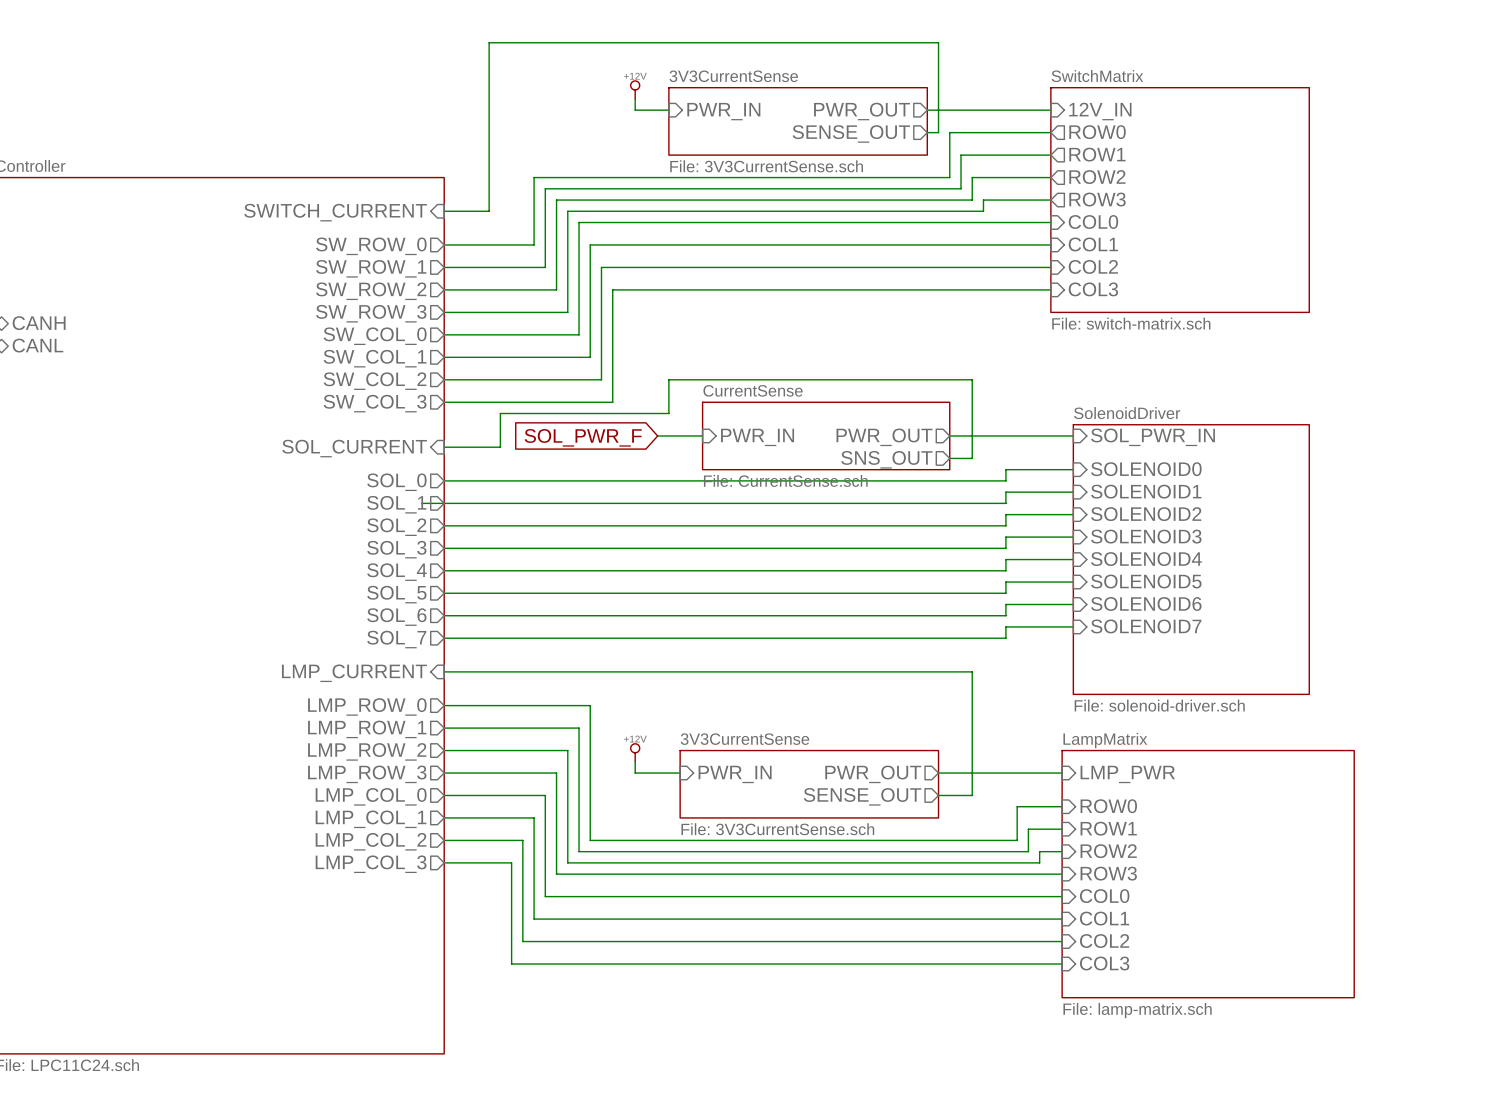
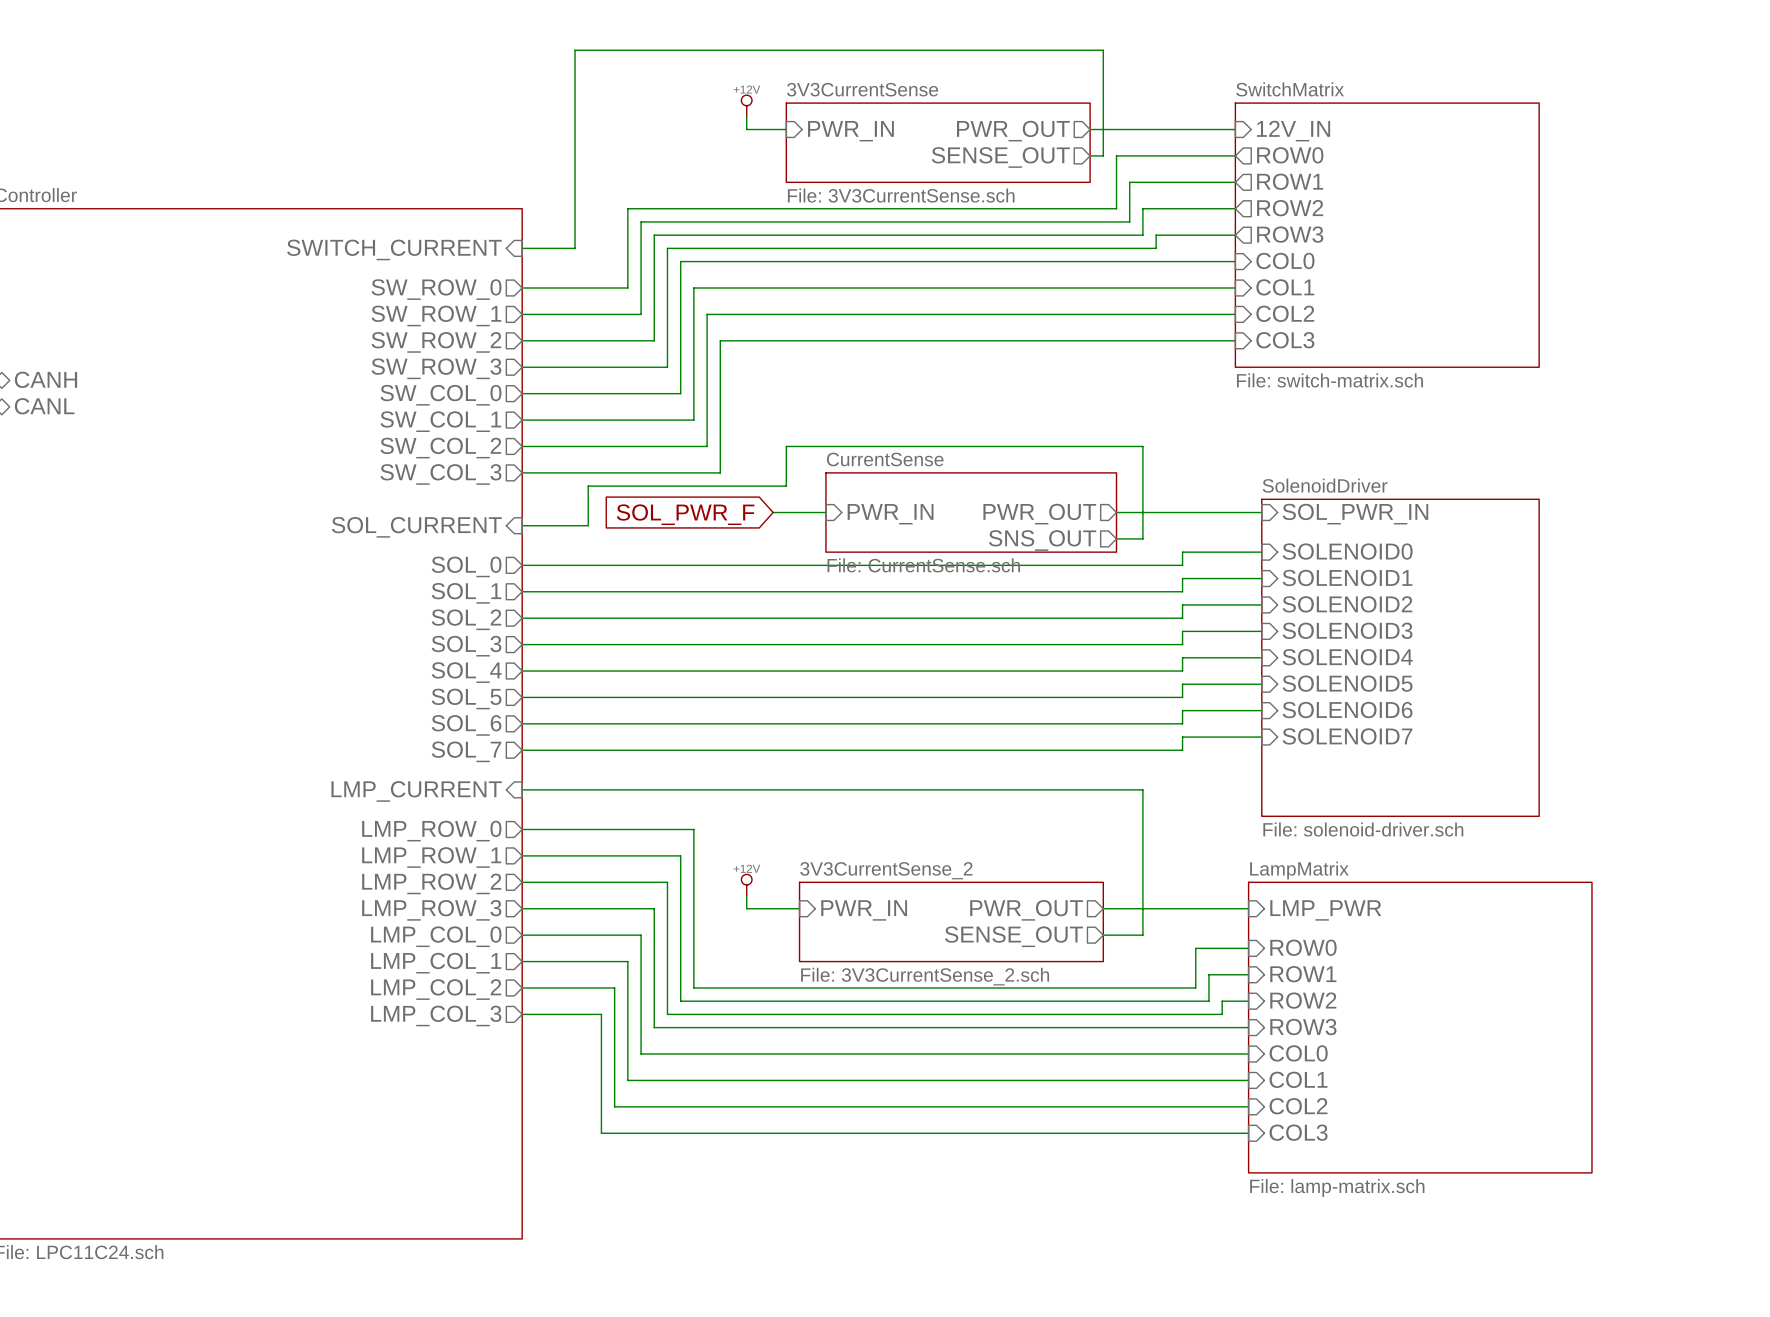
wire: (421, 503) (444, 503) -> none
sheet 3V3CurrentSense name: 3V3CurrentSense (744, 739) -> 3V3CurrentSense_2 (886, 870)
sheet 3V3CurrentSense value: File: 3V3CurrentSense.sch (777, 829) -> File: 3V3CurrentSense_2.sch (925, 976)

